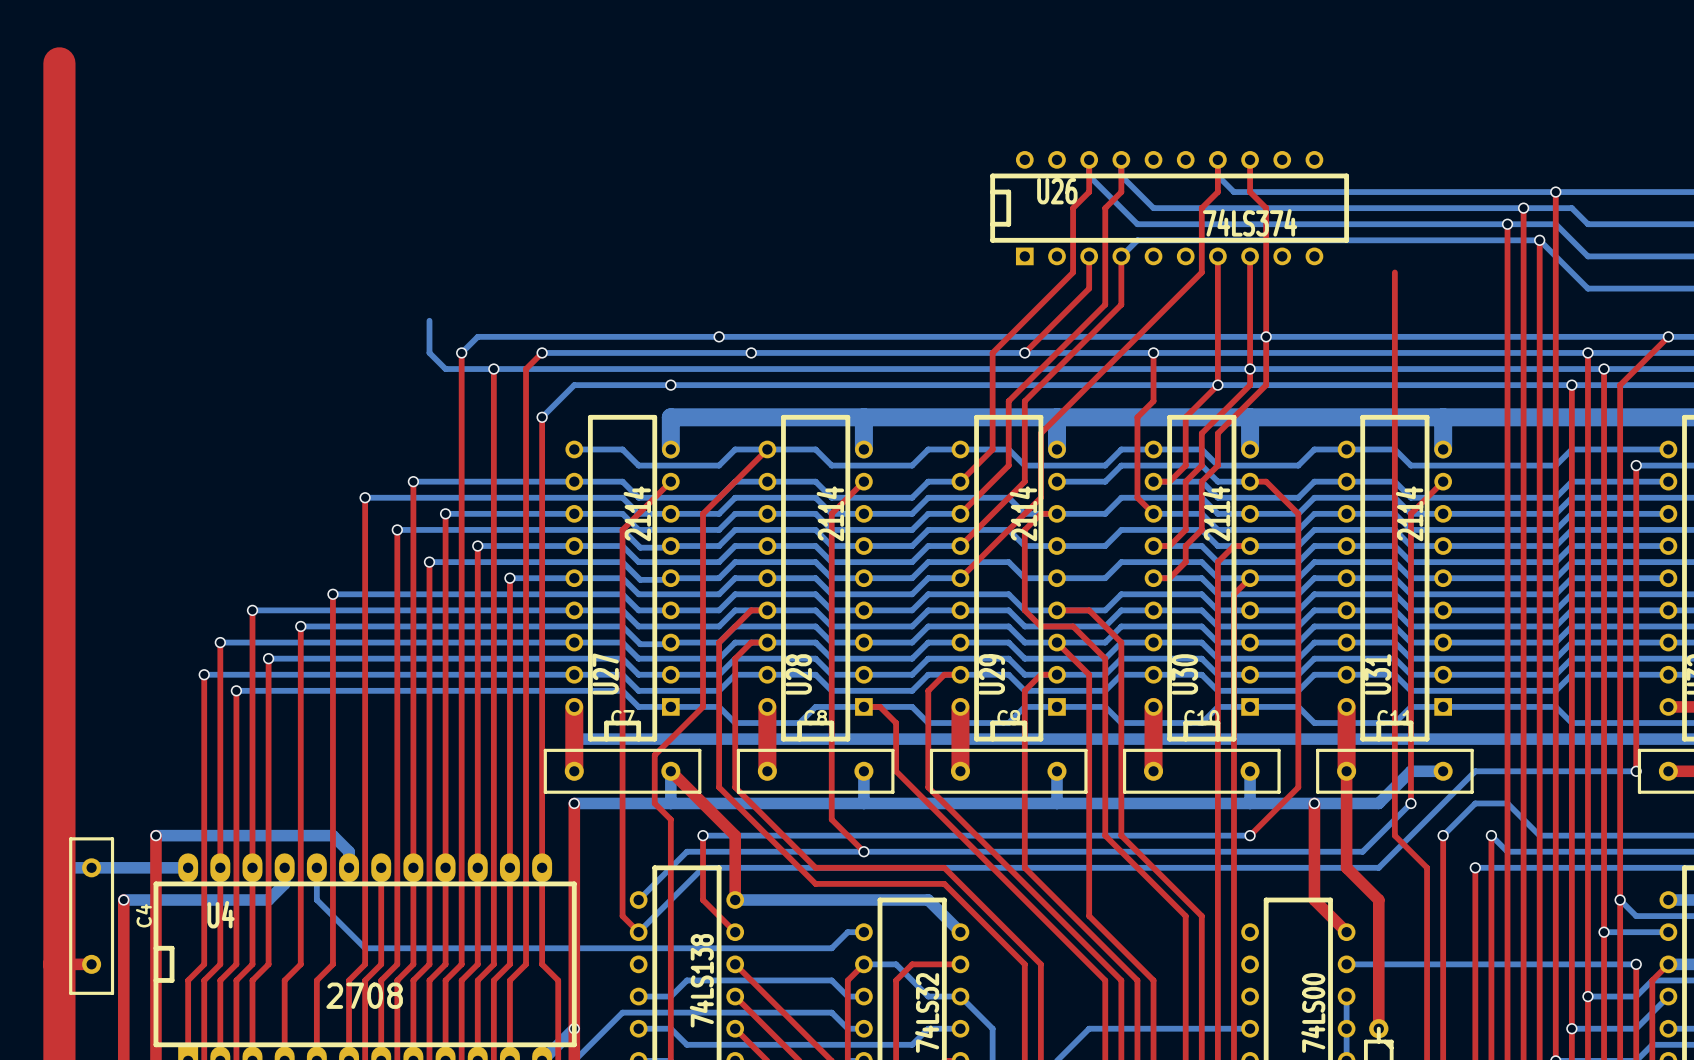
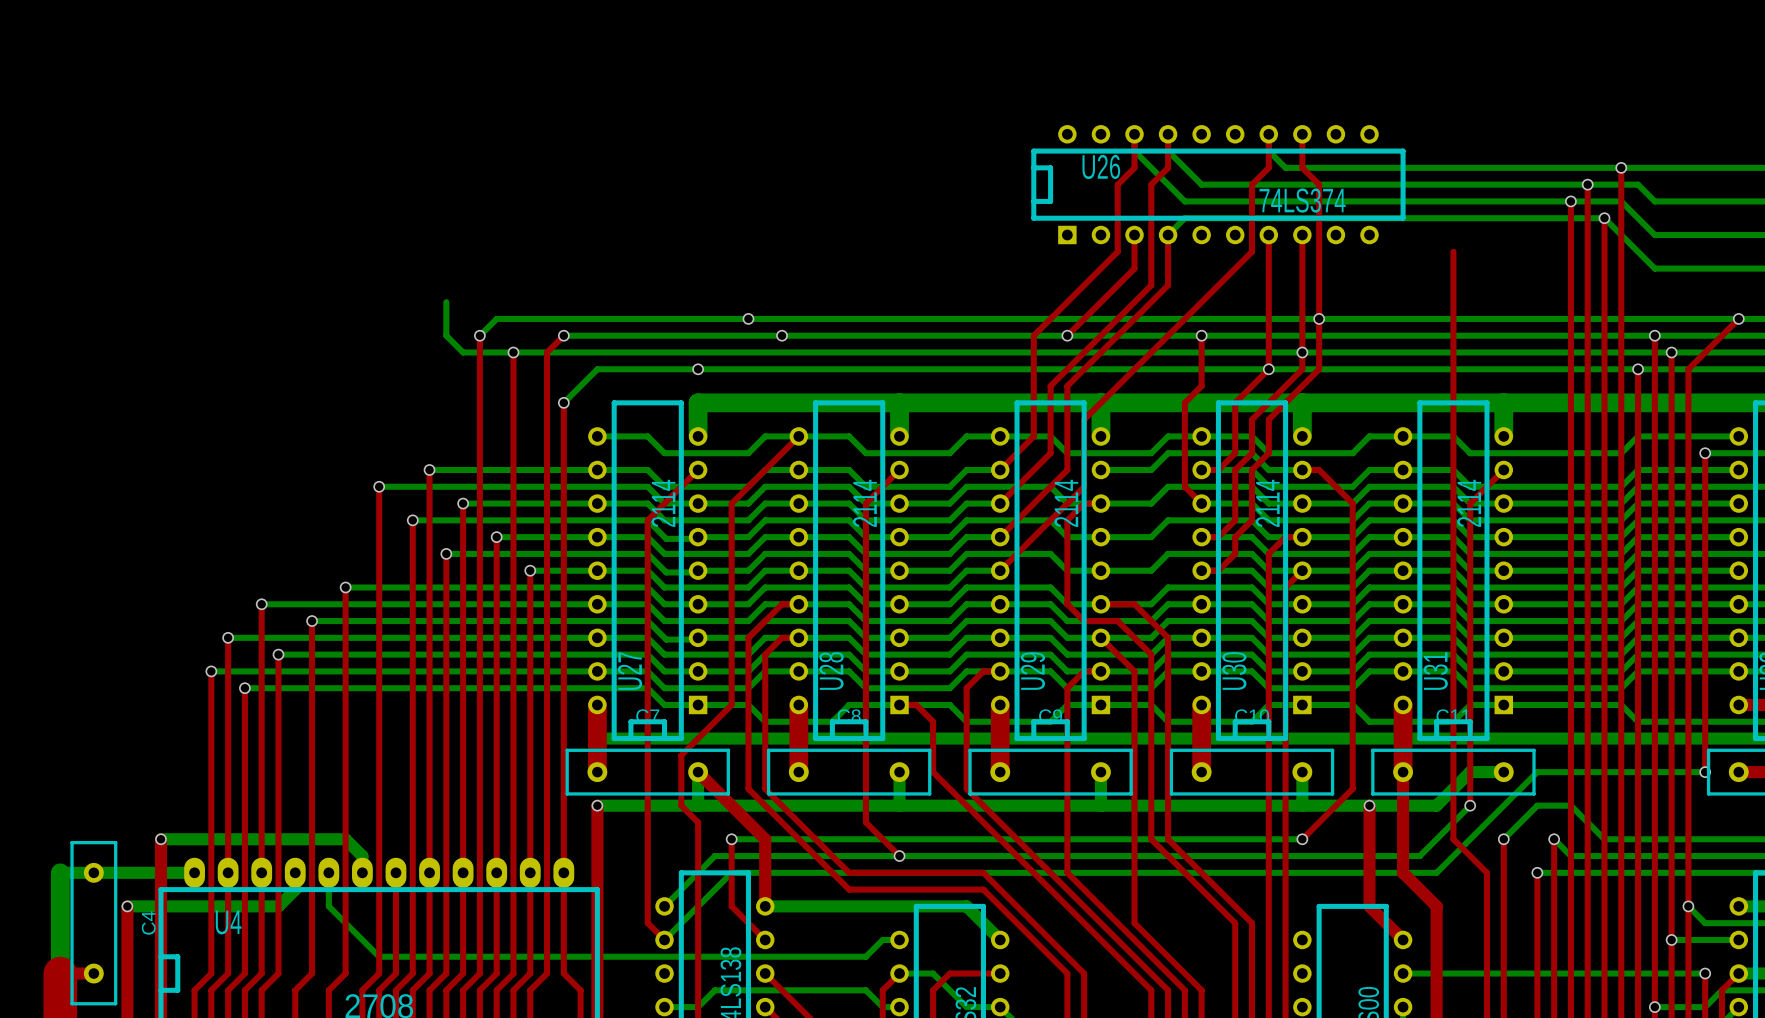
top track: (59, 63) (59, 964) -> none

